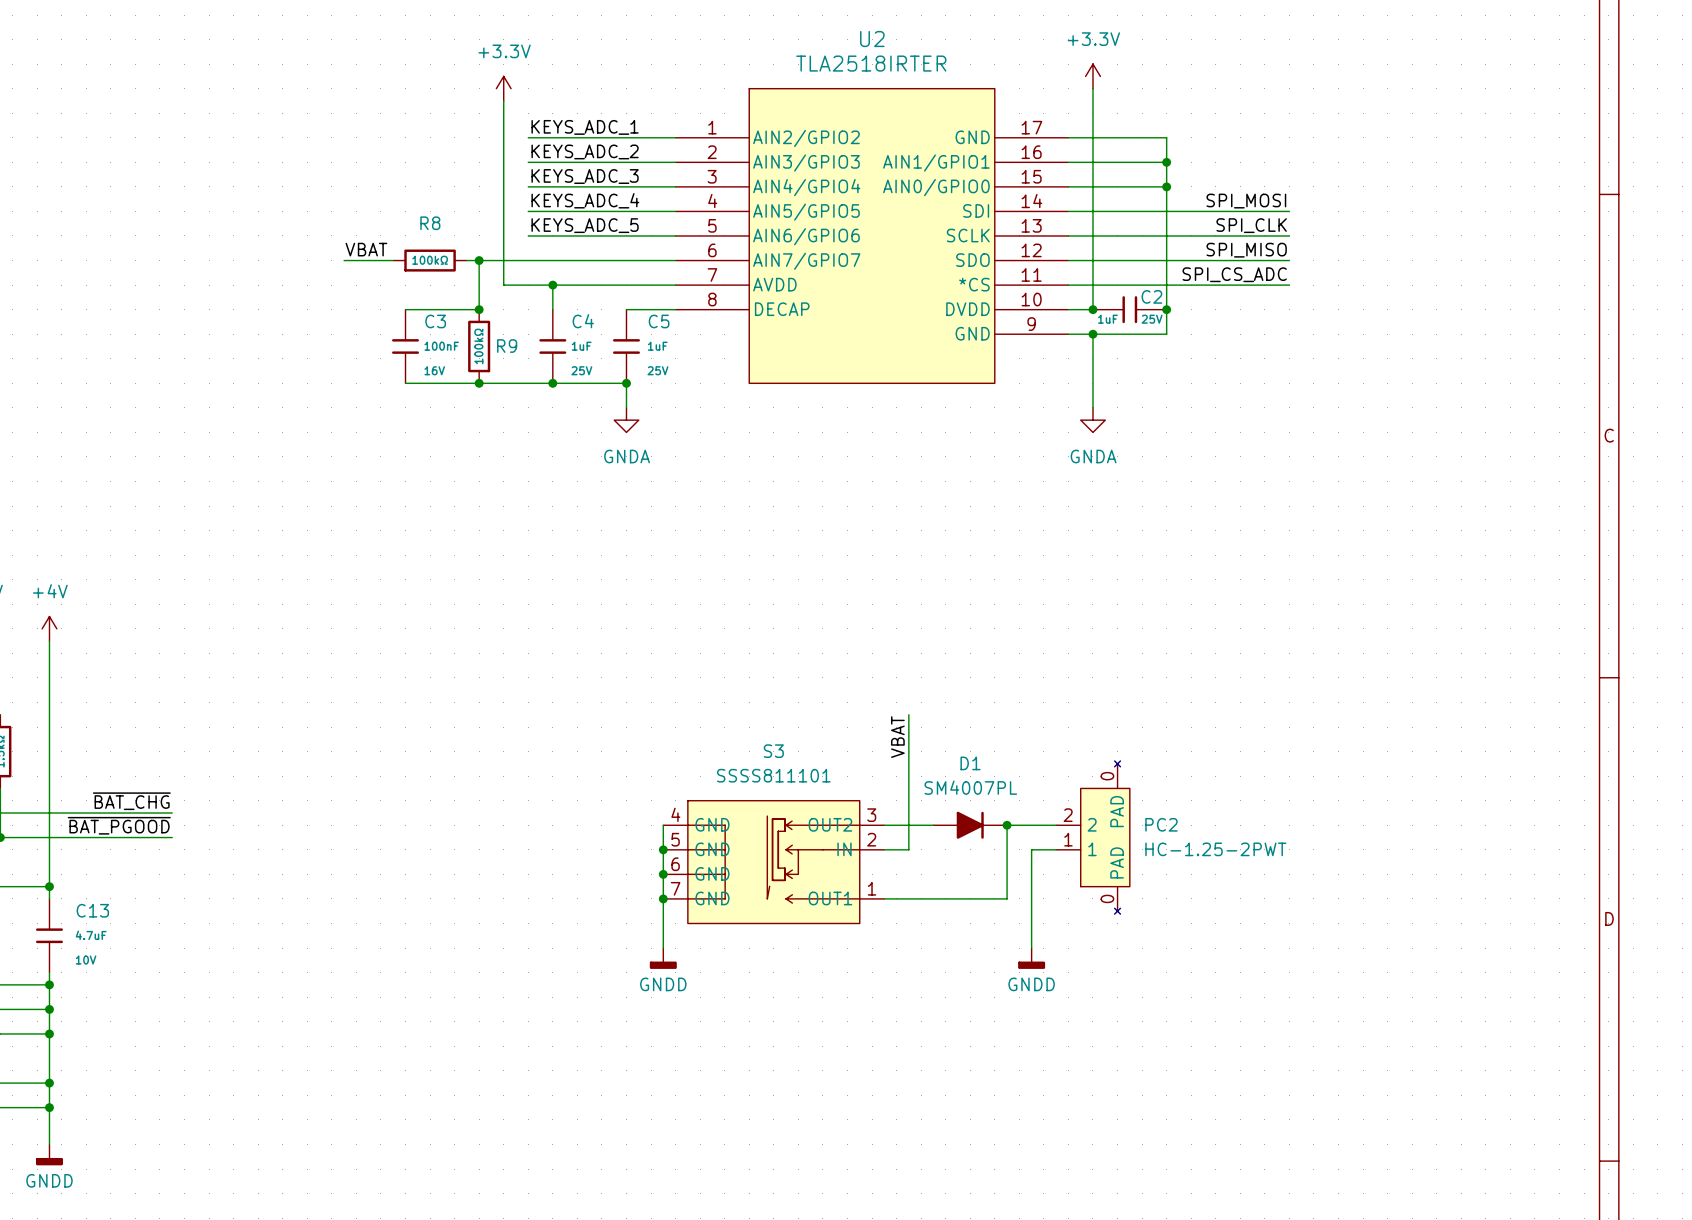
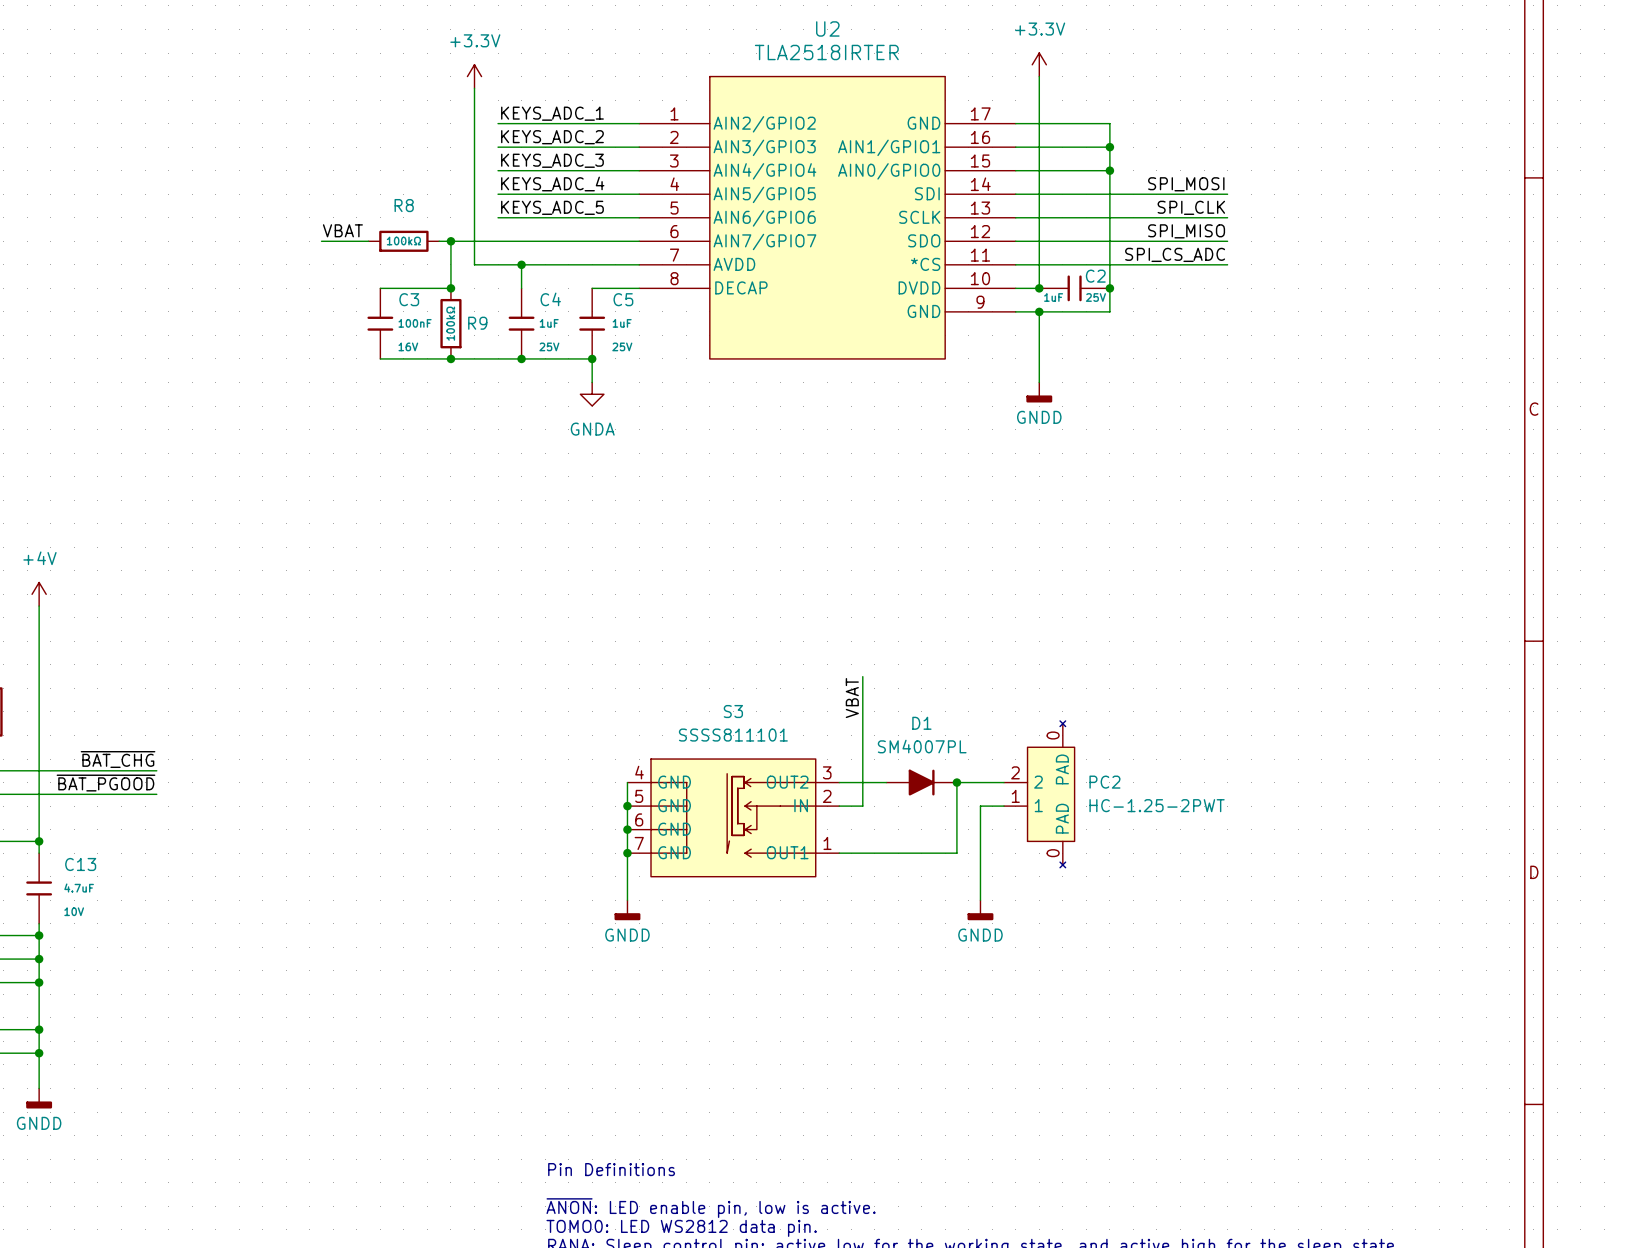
power symbol: GNDA (1092, 420) -> GNDD (1039, 392)

